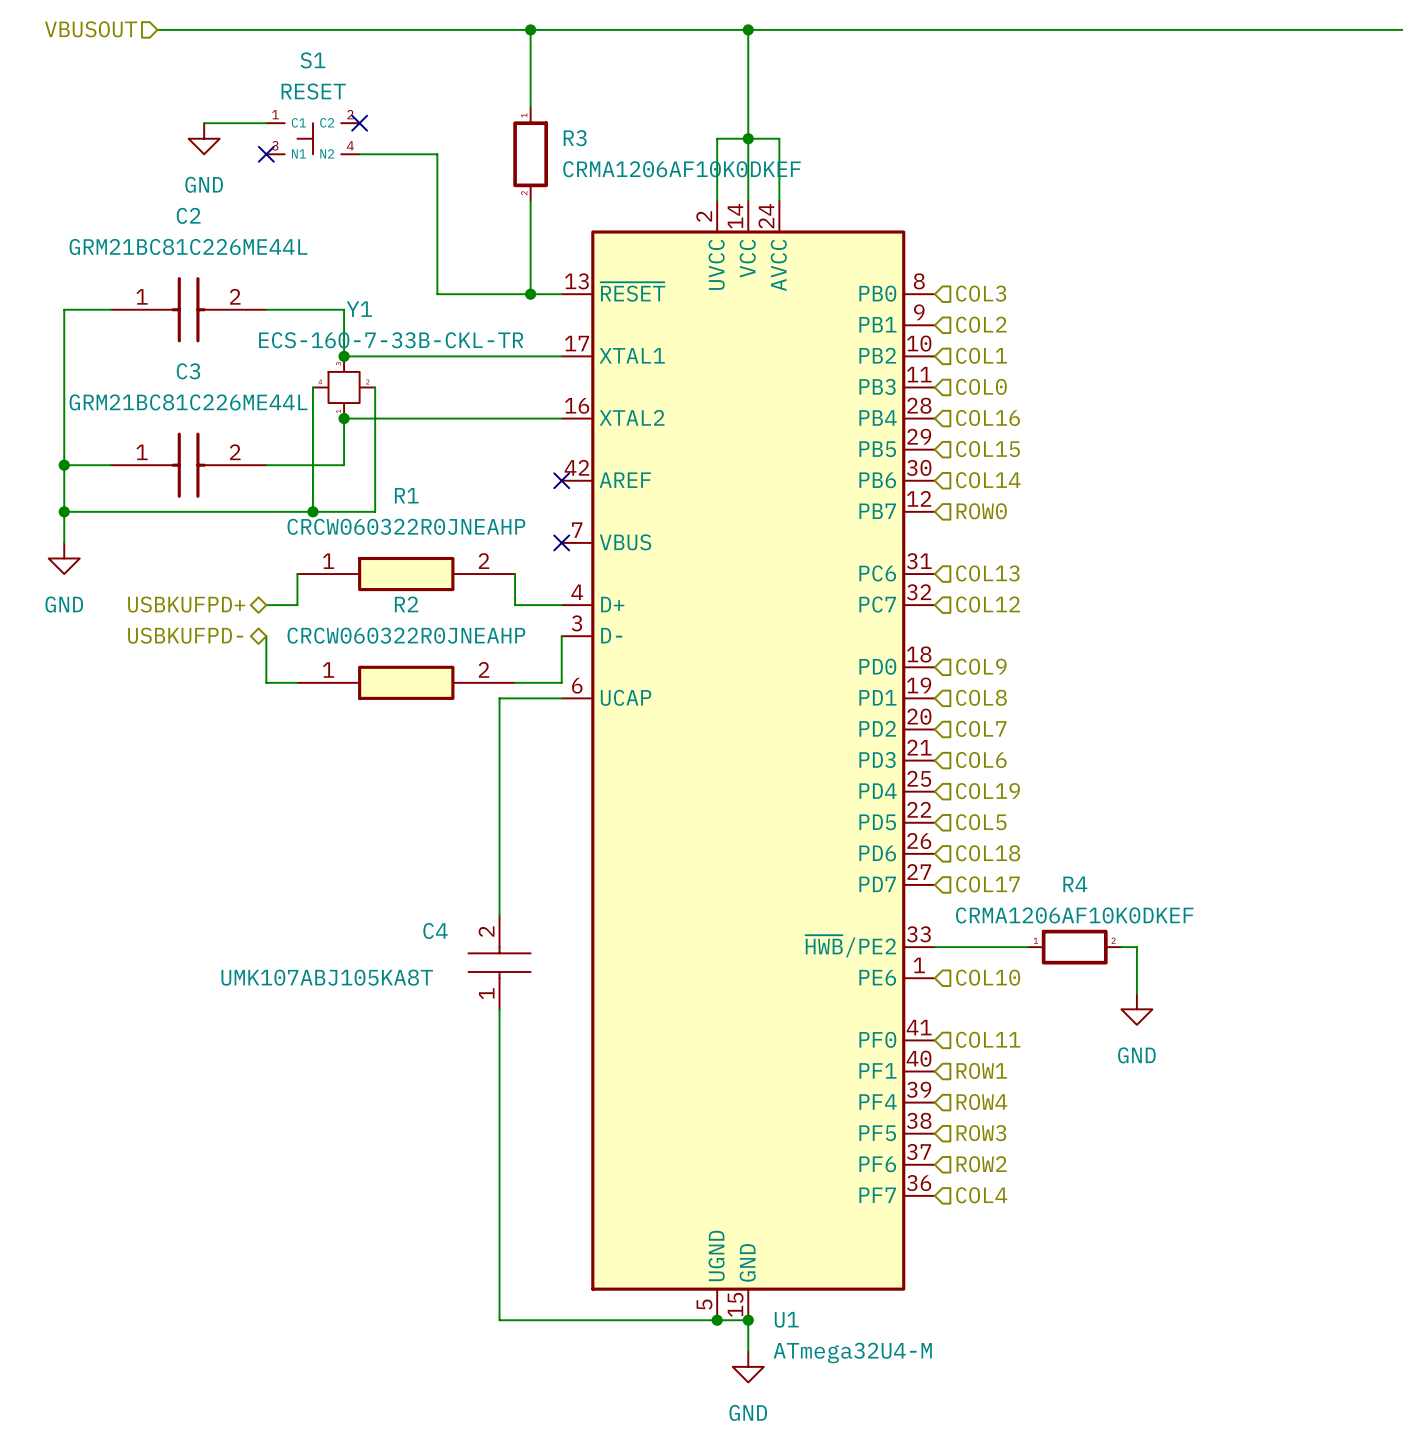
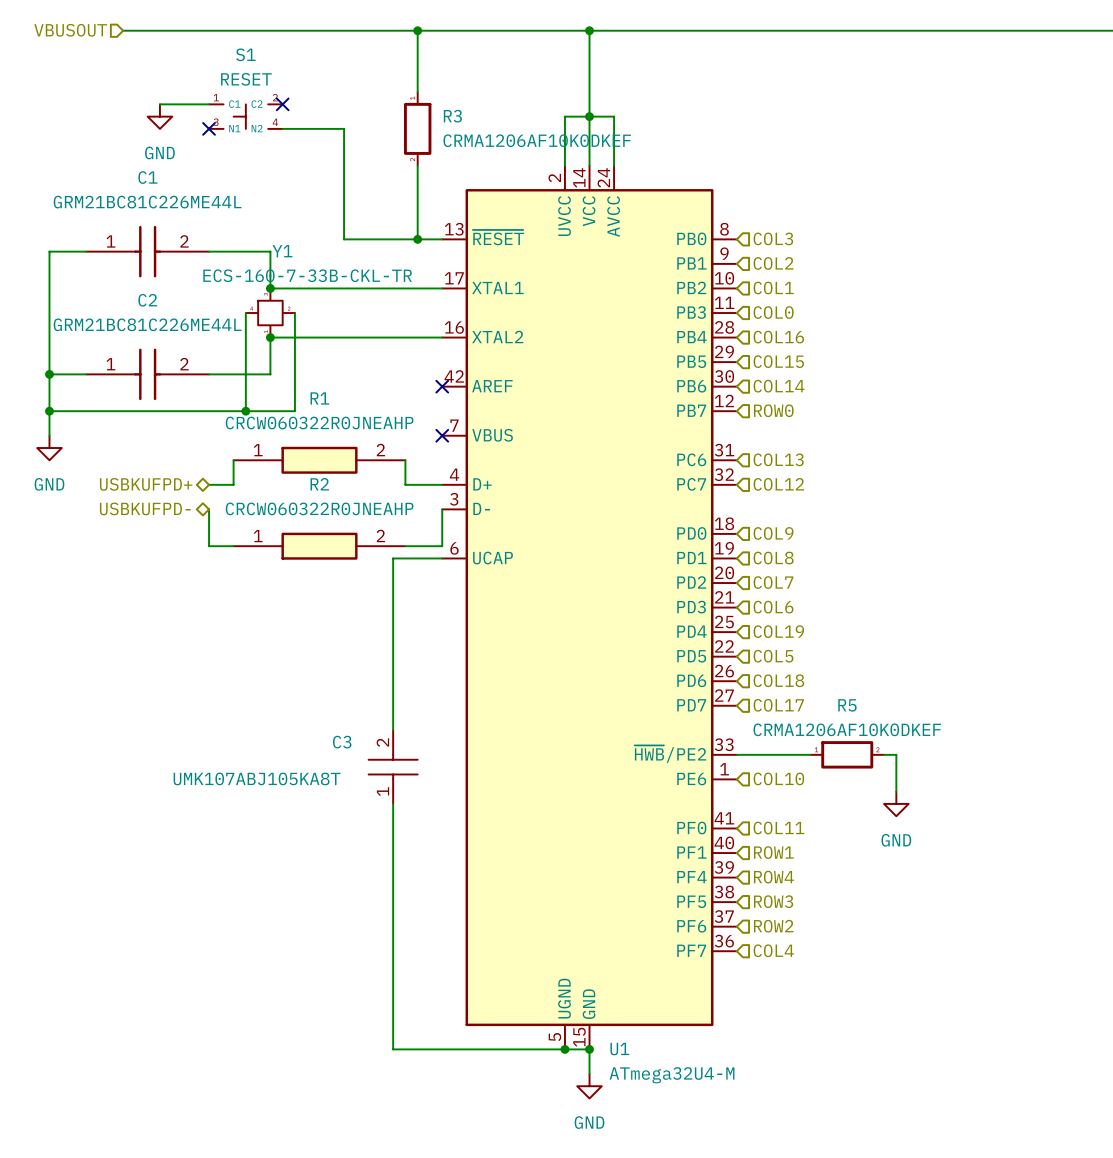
C2 name: C2 (188, 215) -> C1 (147, 177)
C3 name: C3 (188, 371) -> C2 (147, 300)
R4 name: R4 (1075, 884) -> R5 (847, 705)
C4 name: C4 (435, 931) -> C3 (342, 742)

